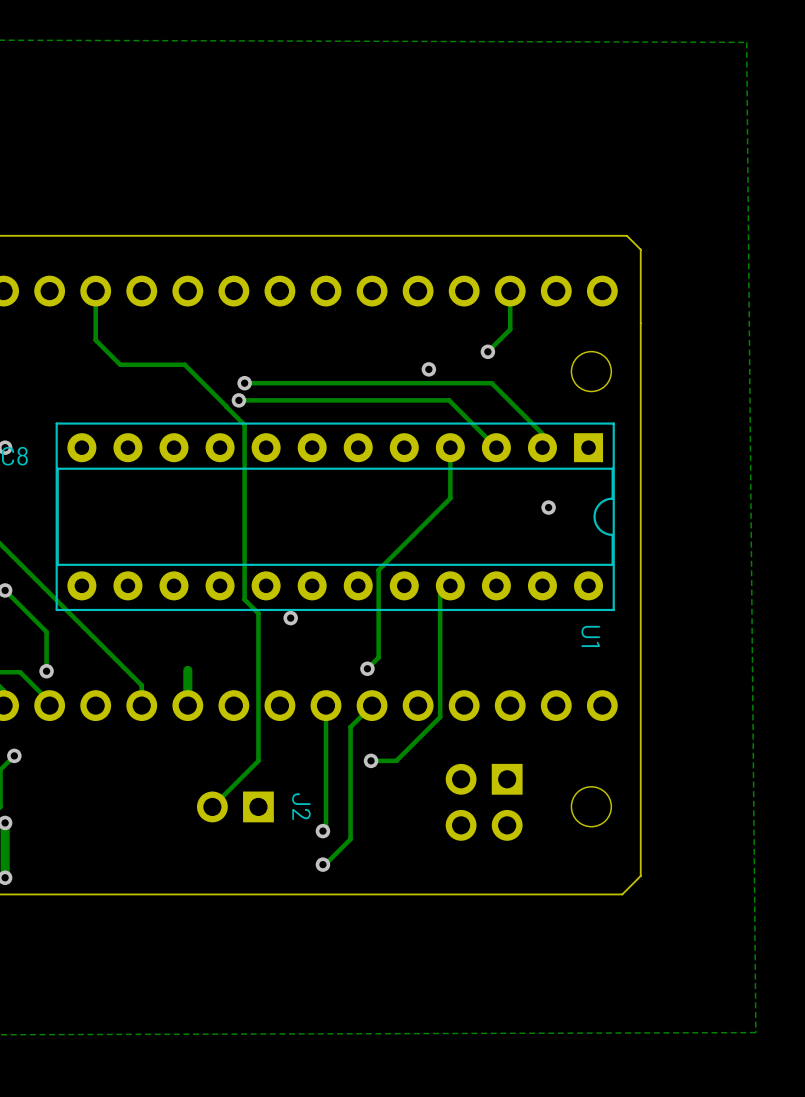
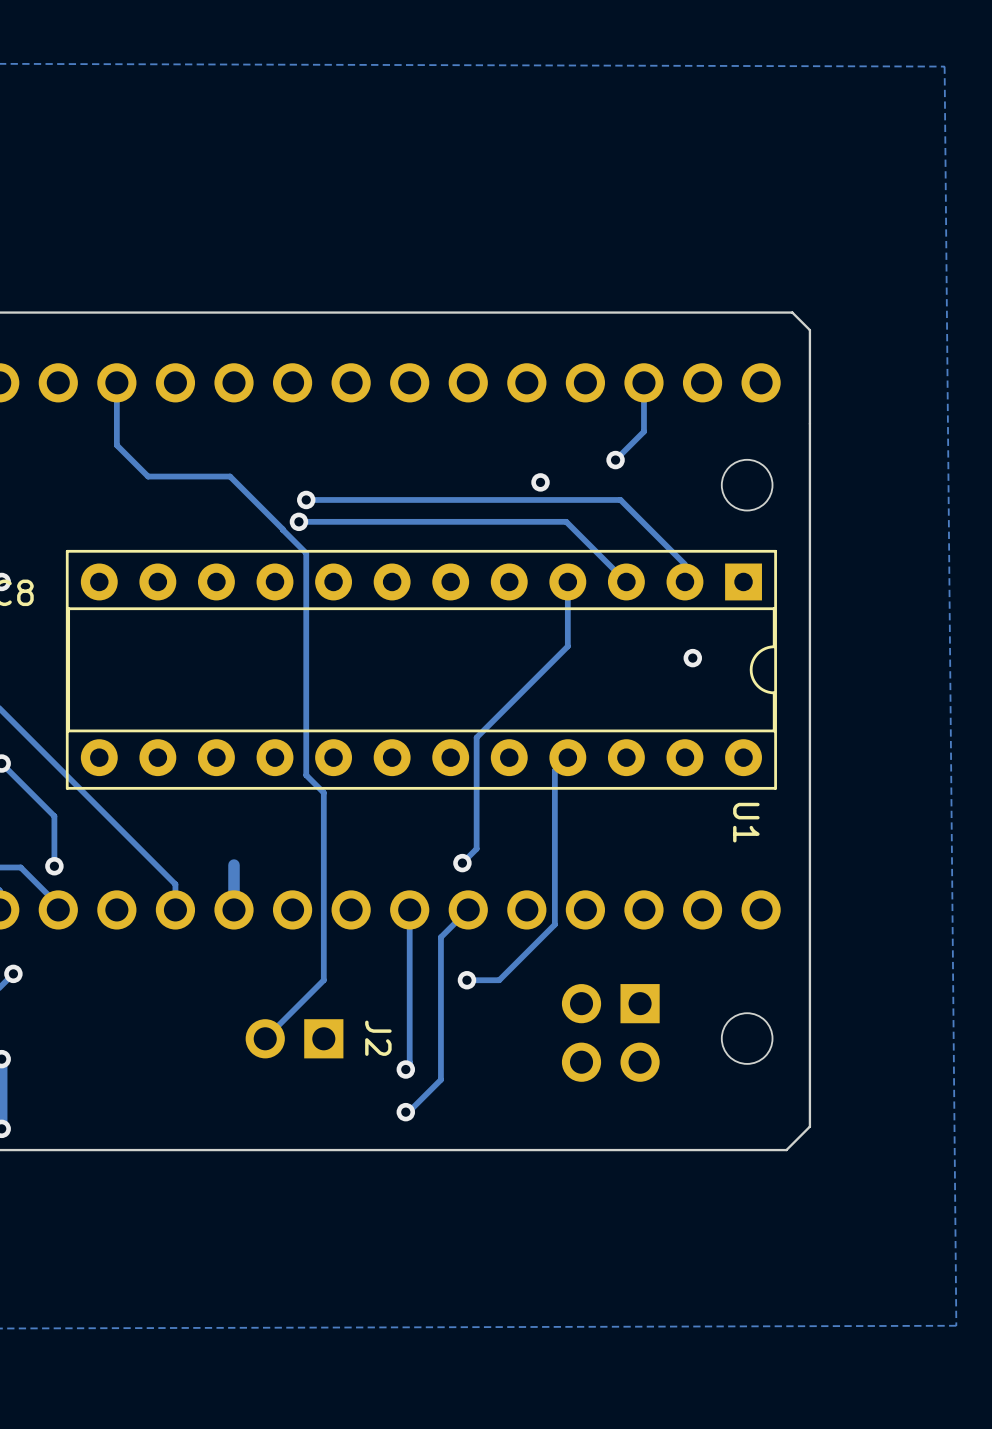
via: (290, 618) -> none

